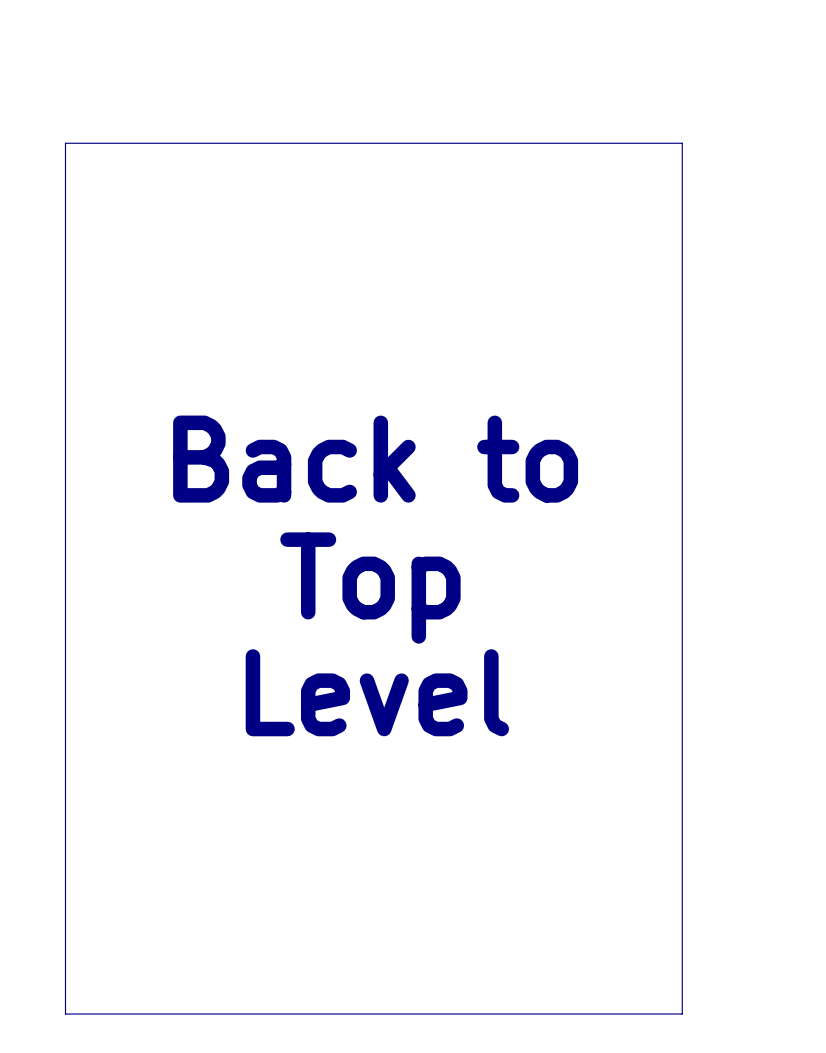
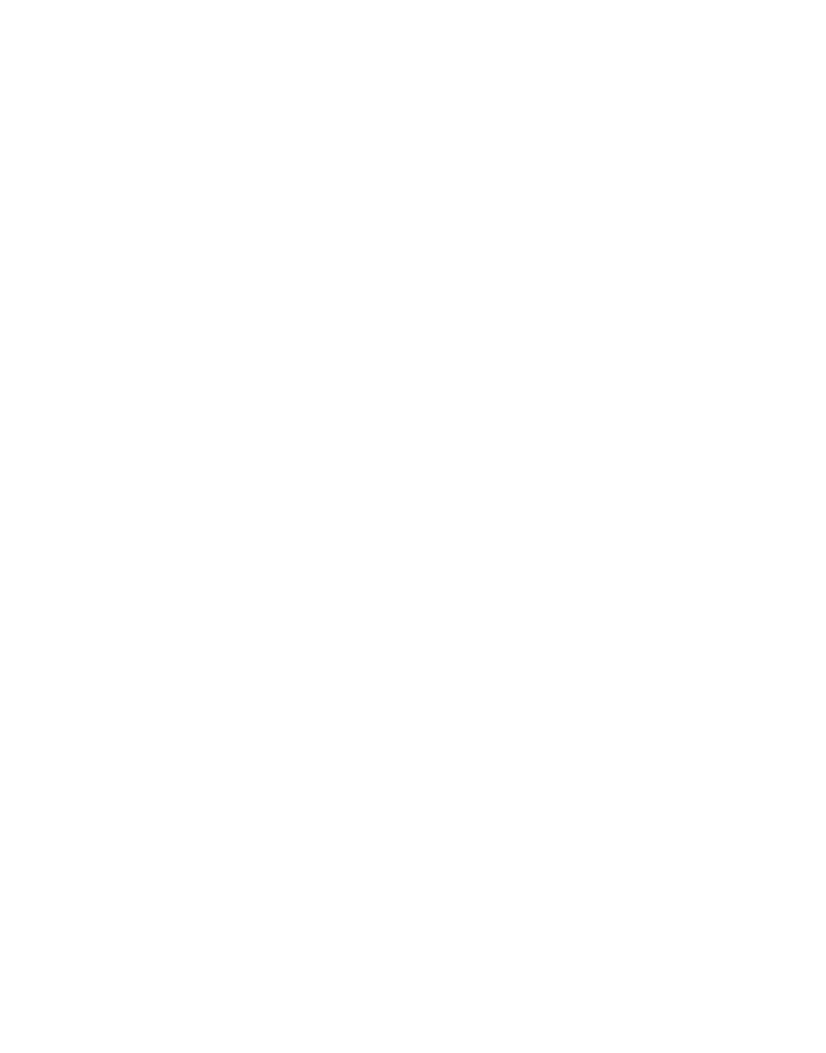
line: (65, 143) (682, 143) (682, 1014) (65, 1014) (65, 143) -> none
text: Back to (375, 459) -> none
text: Top (370, 588) -> none
text: Level (377, 692) -> none

